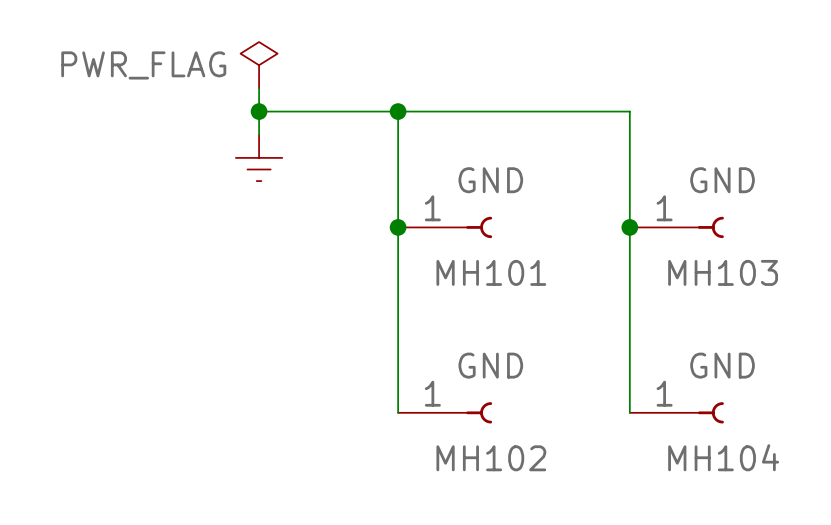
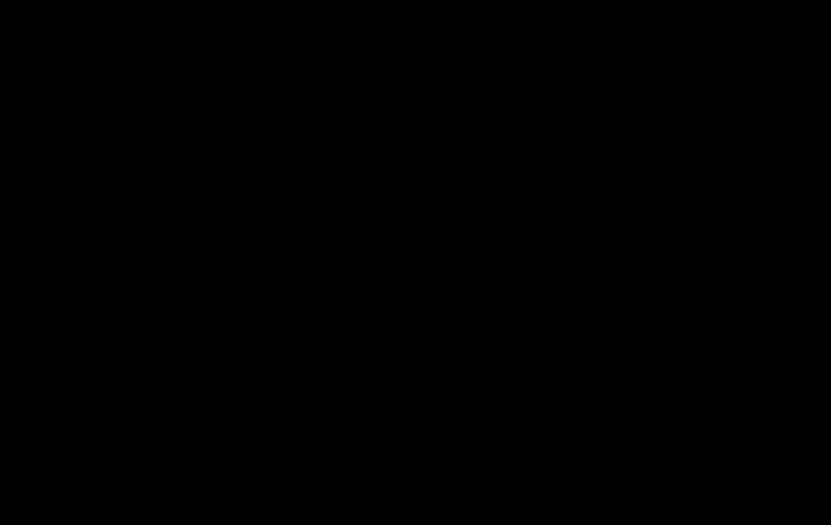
power symbol: PWR_FLAG (259, 65) -> none
wire: (259, 88) (259, 134) -> none
wire: (259, 111) (629, 111) (629, 412) -> none
junction: (259, 111) -> none
wire: (398, 111) (398, 412) -> none
junction: (398, 111) -> none
power symbol: (259, 157) -> none
junction: (398, 227) -> none
MH101: GND (445, 227) -> none
junction: (629, 227) -> none
MH103: GND (676, 227) -> none
MH102: GND (445, 412) -> none
MH104: GND (676, 412) -> none

